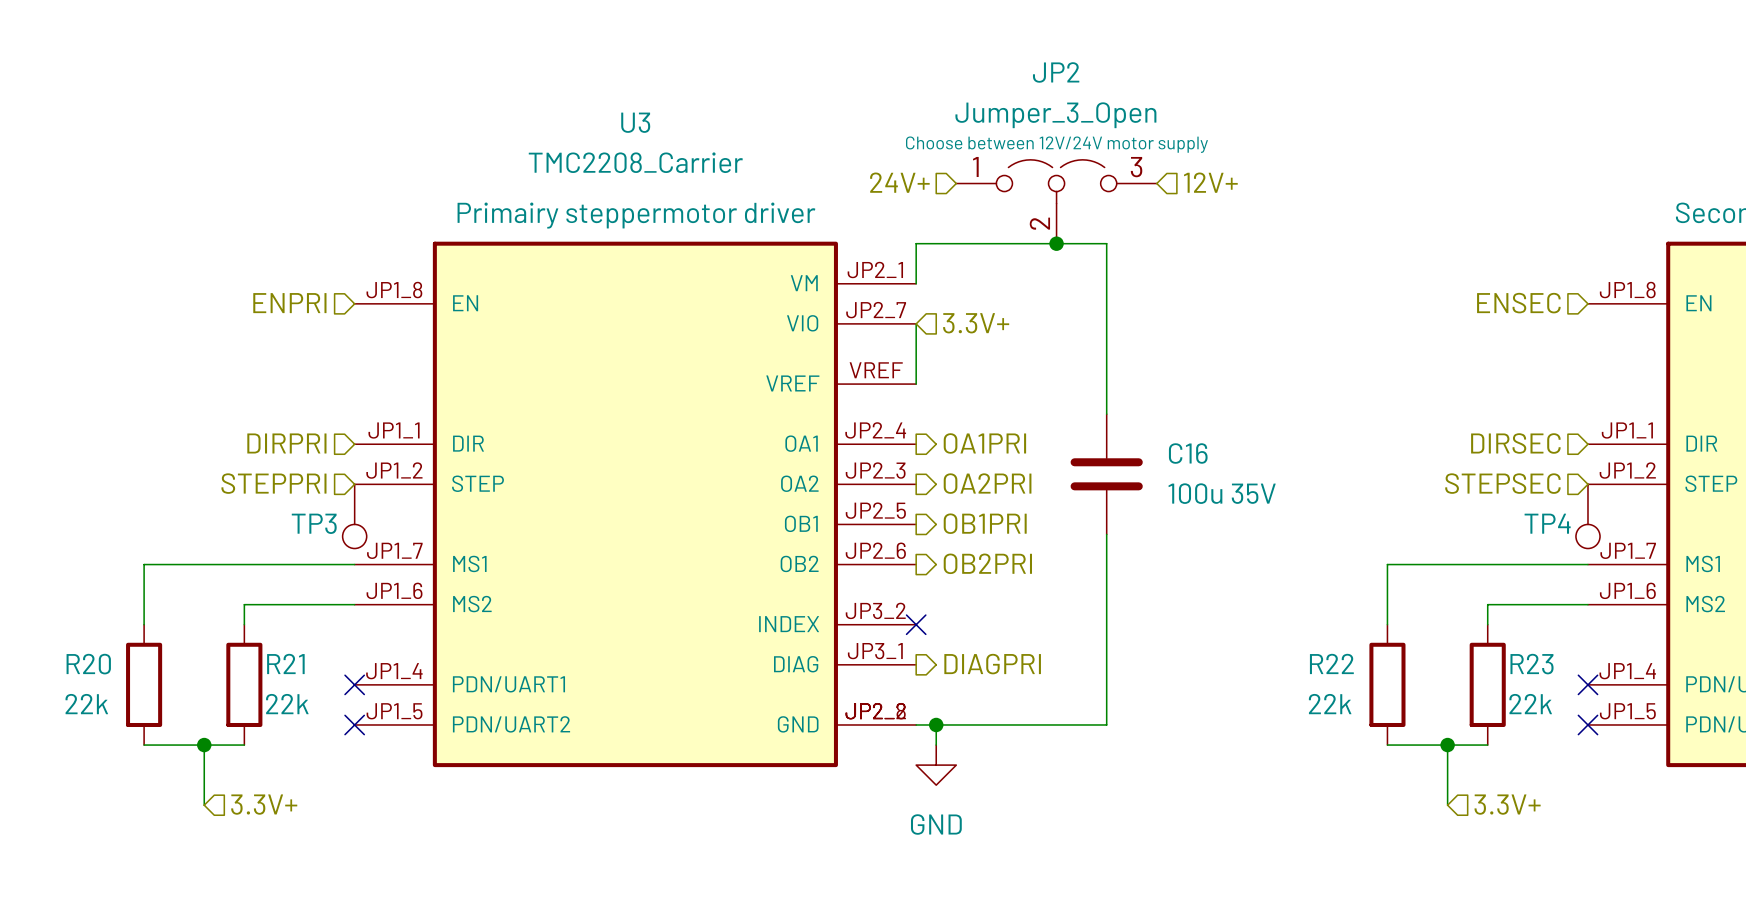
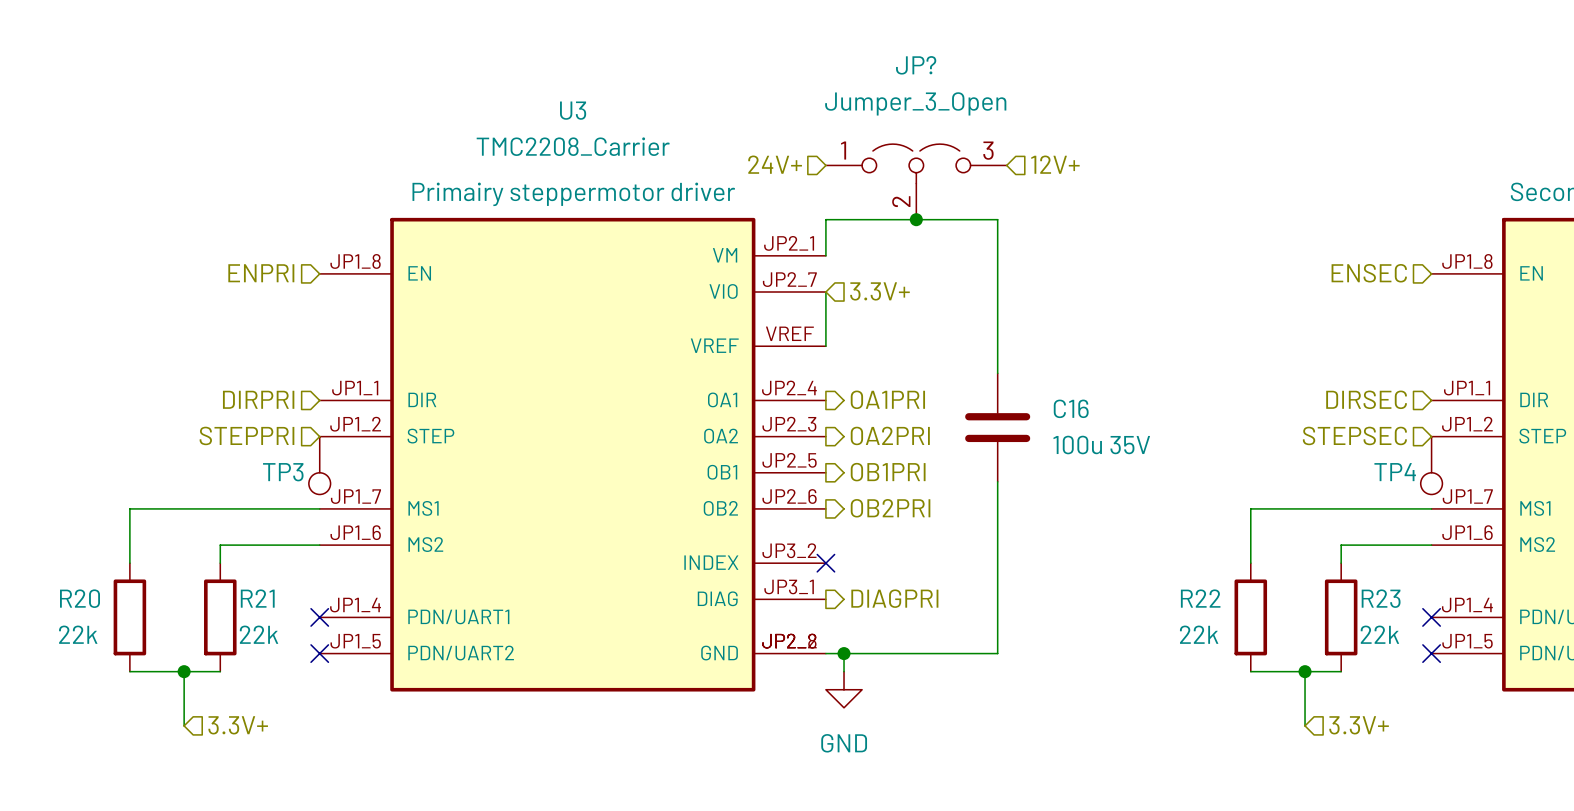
hierarchical label position: 24V+ (899, 182) -> 24V+ (775, 164)
hierarchical label position: 12V+ (1210, 182) -> 12V+ (1055, 164)
JP?: none -> Jumper_3_Open (916, 181)
JP2: Jumper_3_Open (1056, 201) -> none
junction position: (1056, 243) -> (916, 219)

